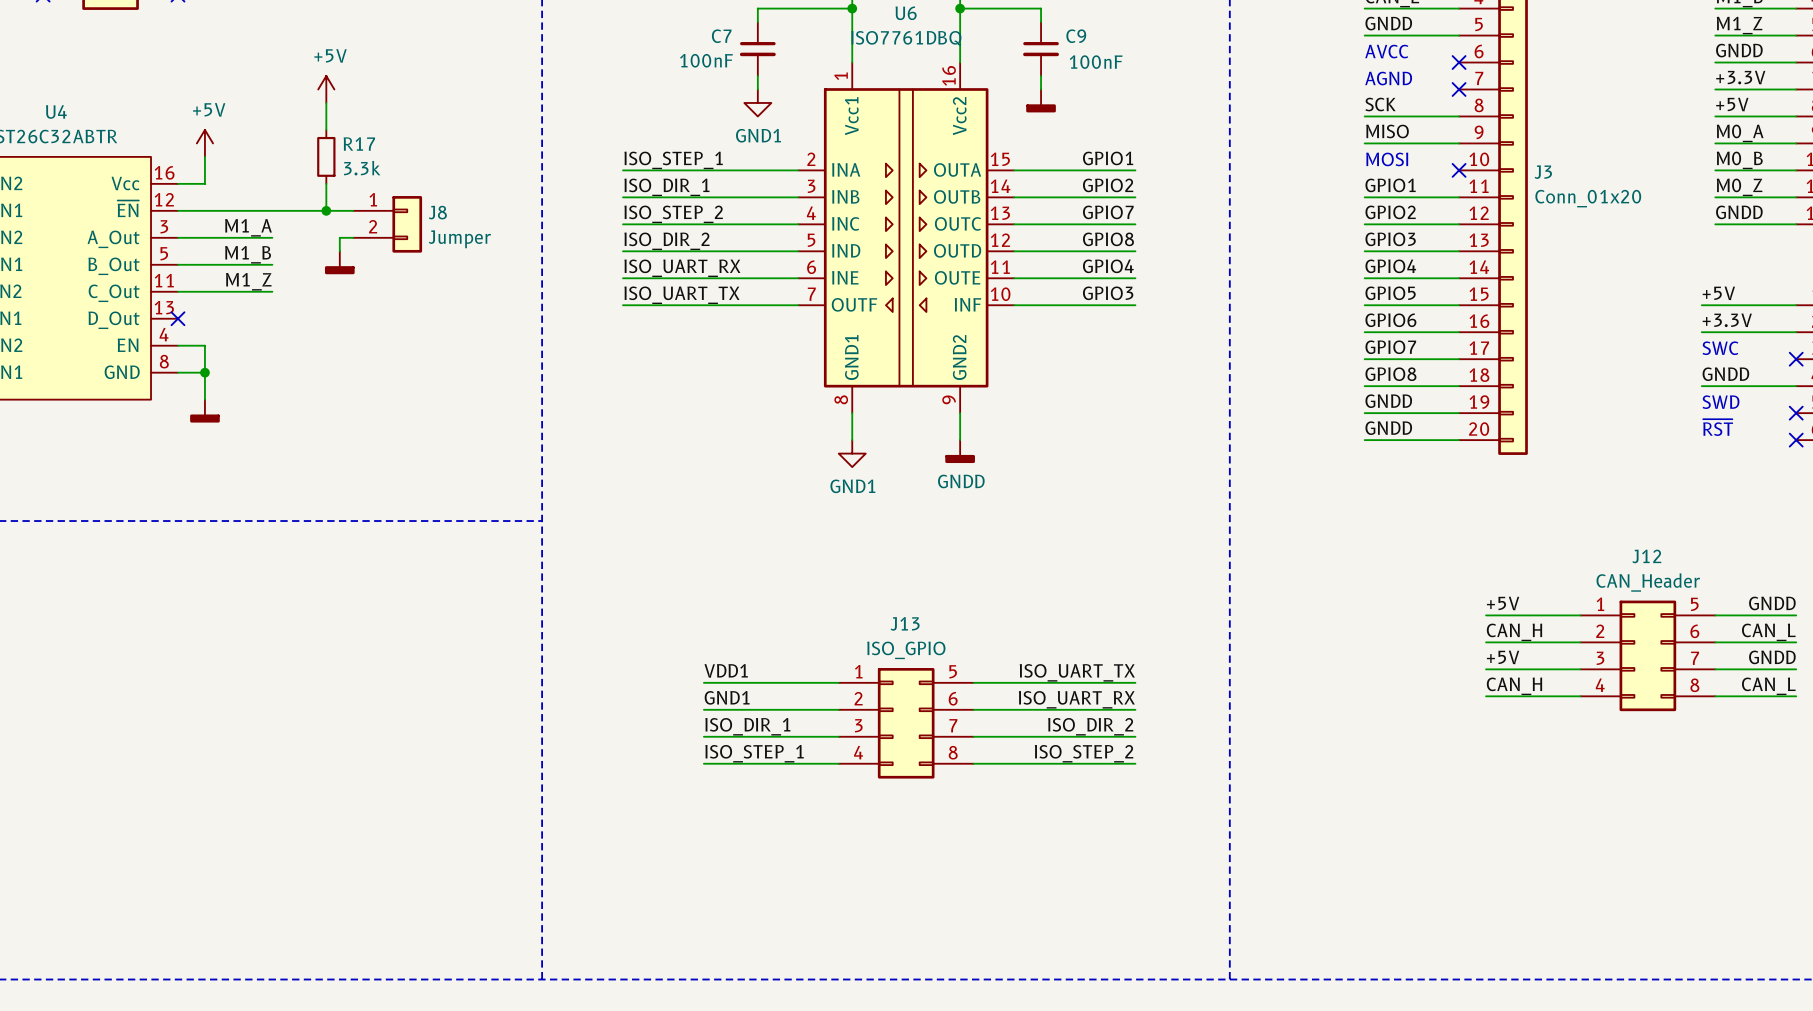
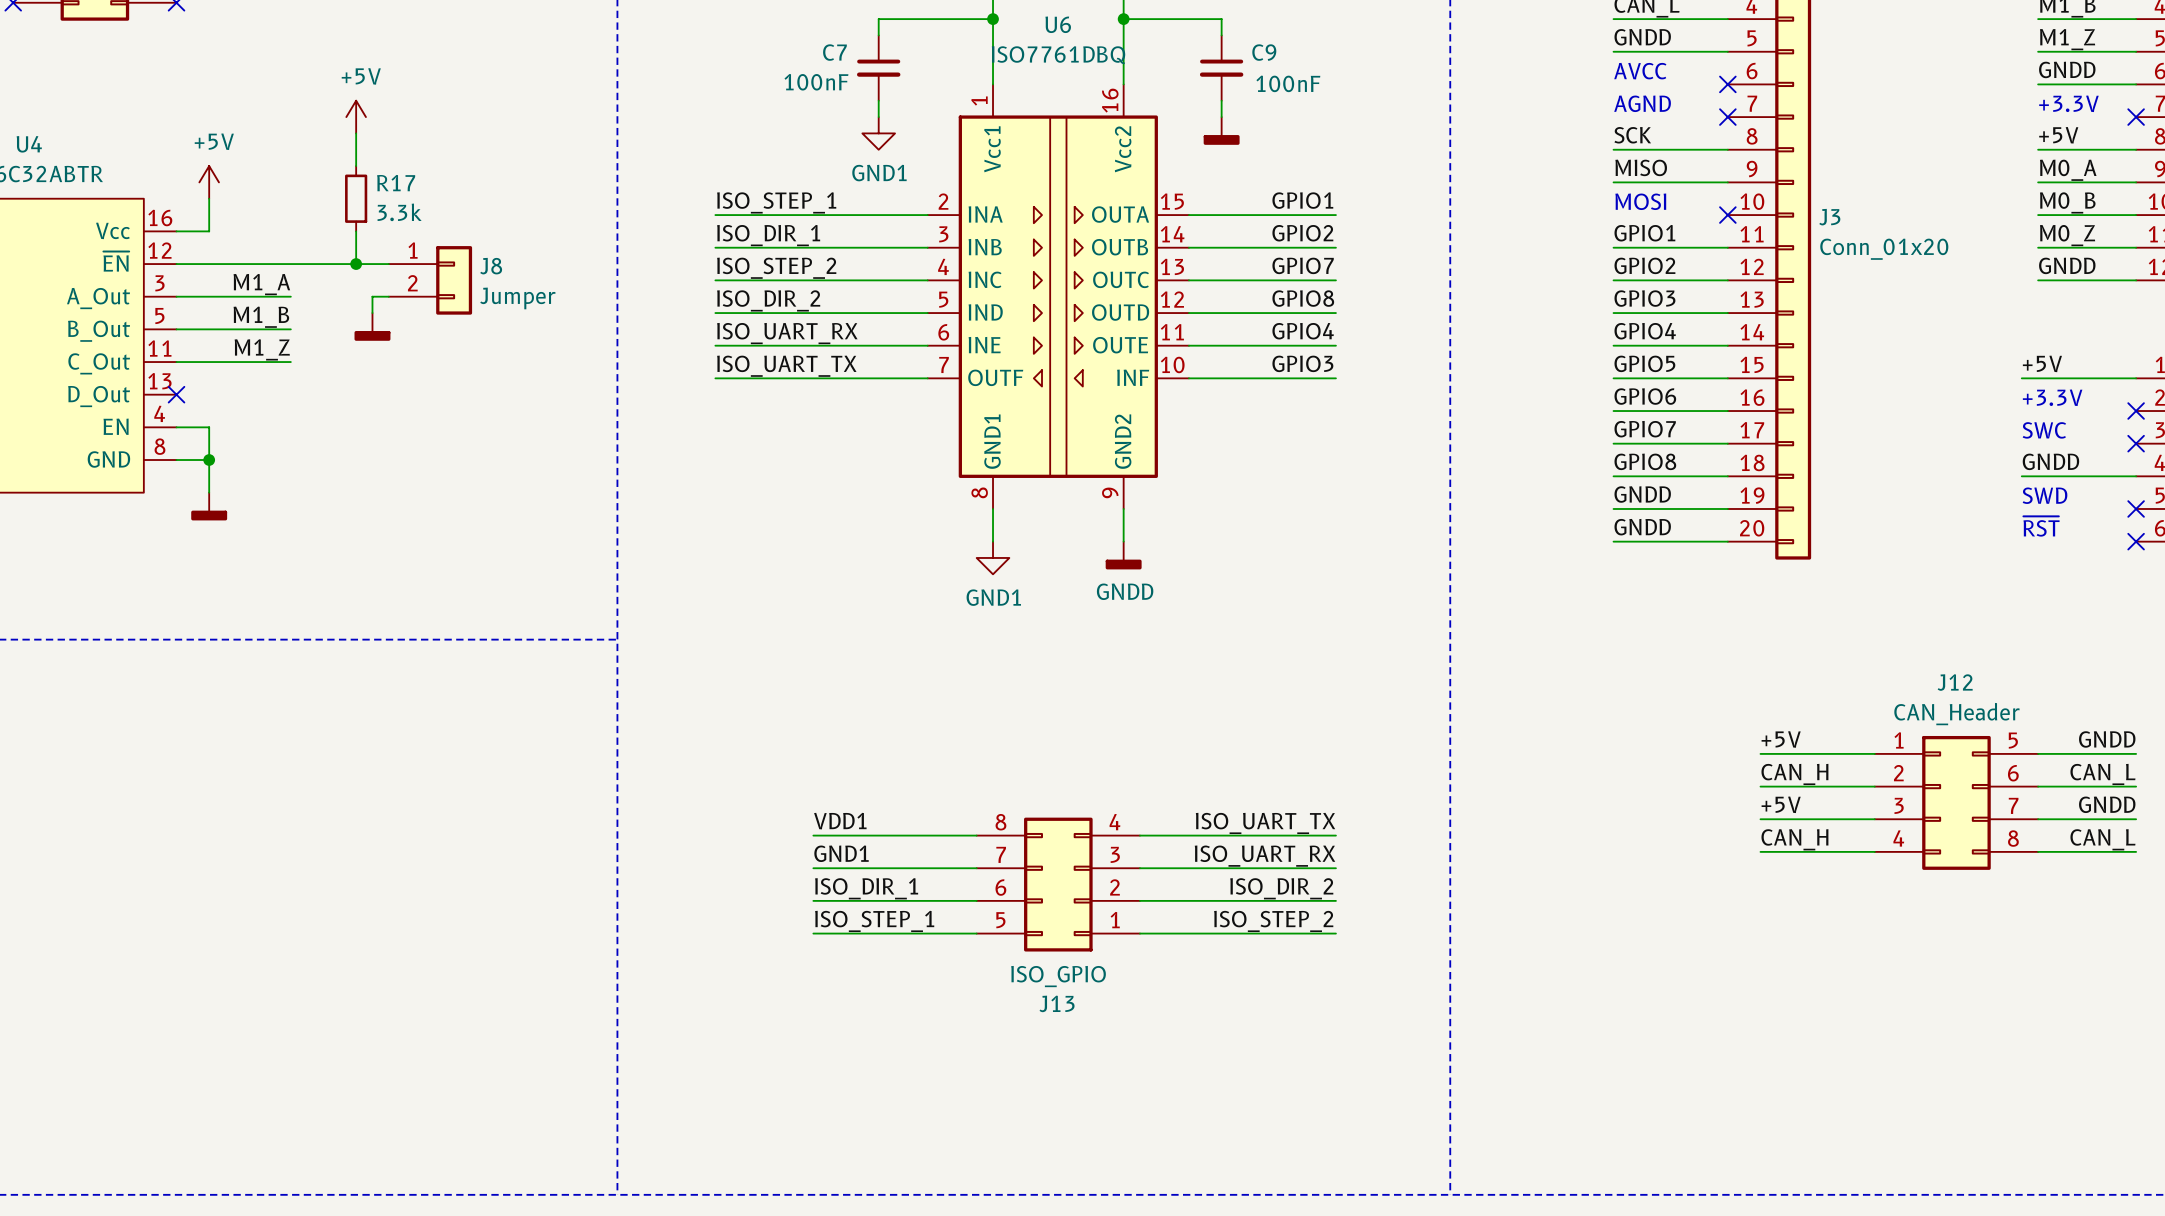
label: +3.3V (1740, 77) -> none
text: none -> +3.3V (2068, 103)
wire: (1715, 89) (1796, 89) -> none
no-connect mark: none -> (2136, 117)
label: +3.3V (1727, 320) -> none
text: none -> +3.3V (2052, 397)
wire: (1701, 332) (1796, 332) -> none
no-connect mark: none -> (2136, 411)
J13 rotation: 0° (906, 723) -> 180° (1058, 884)

